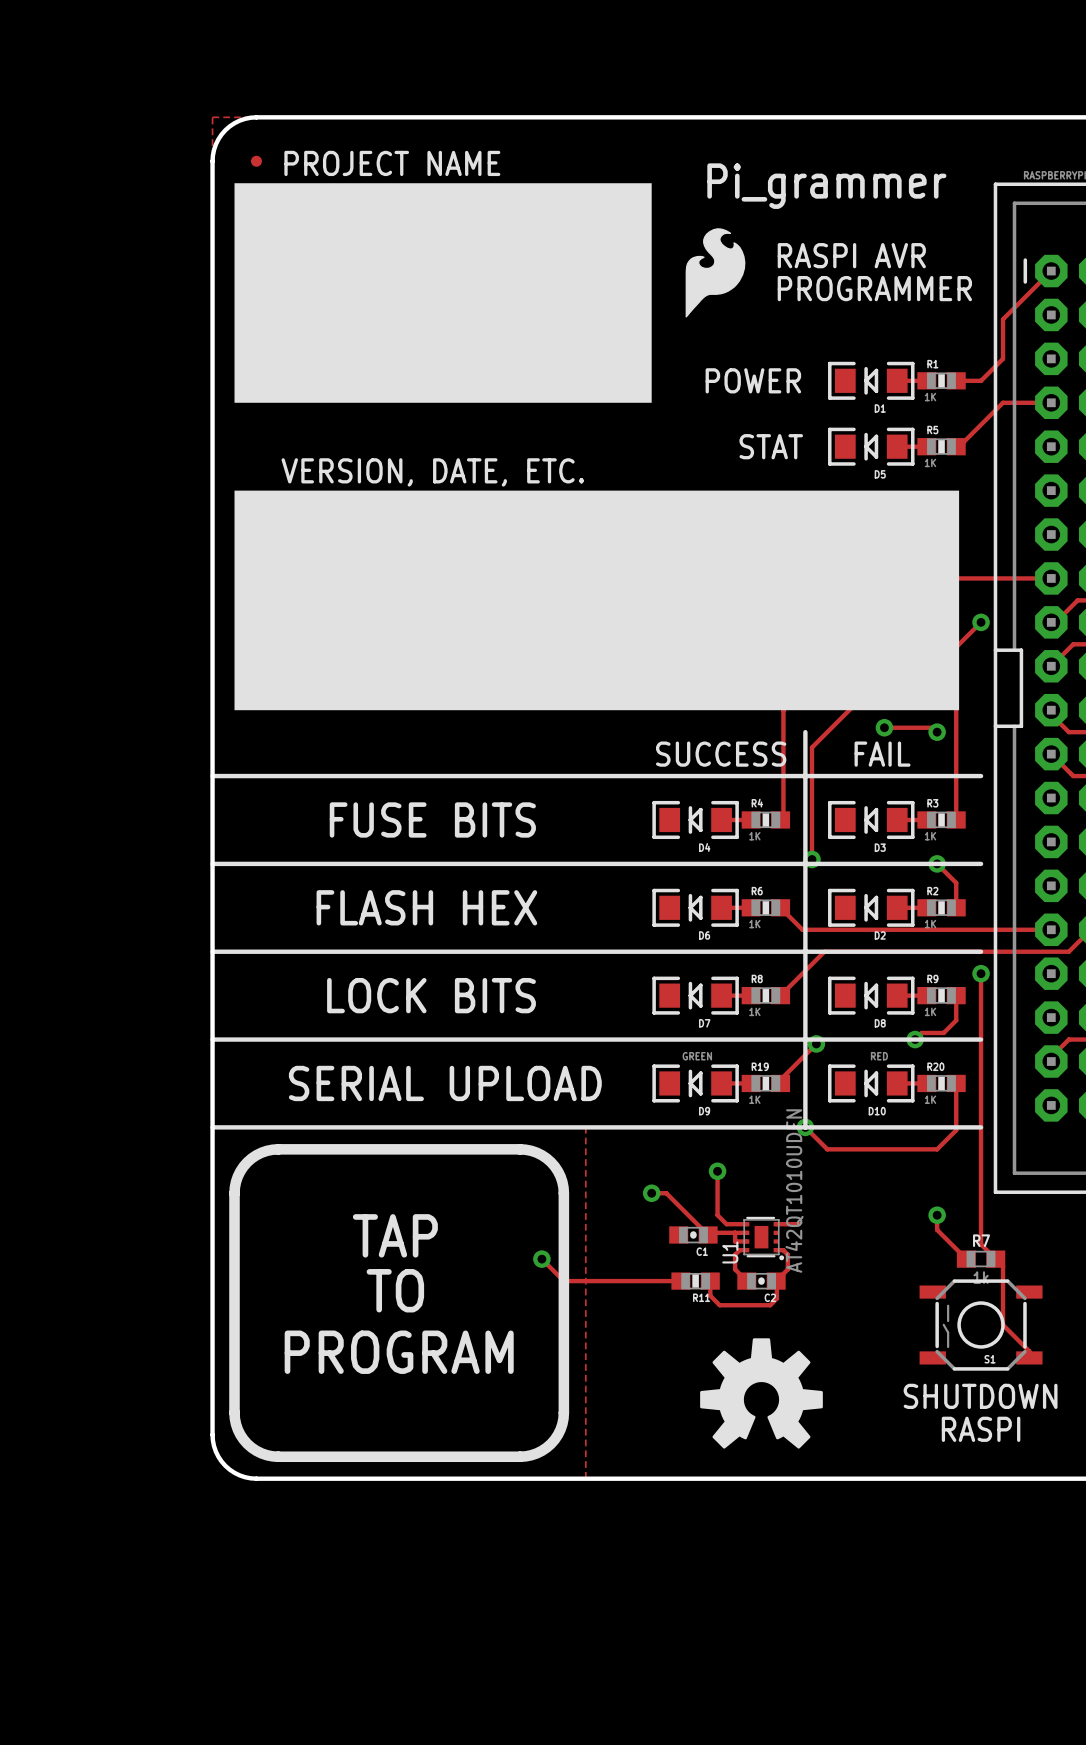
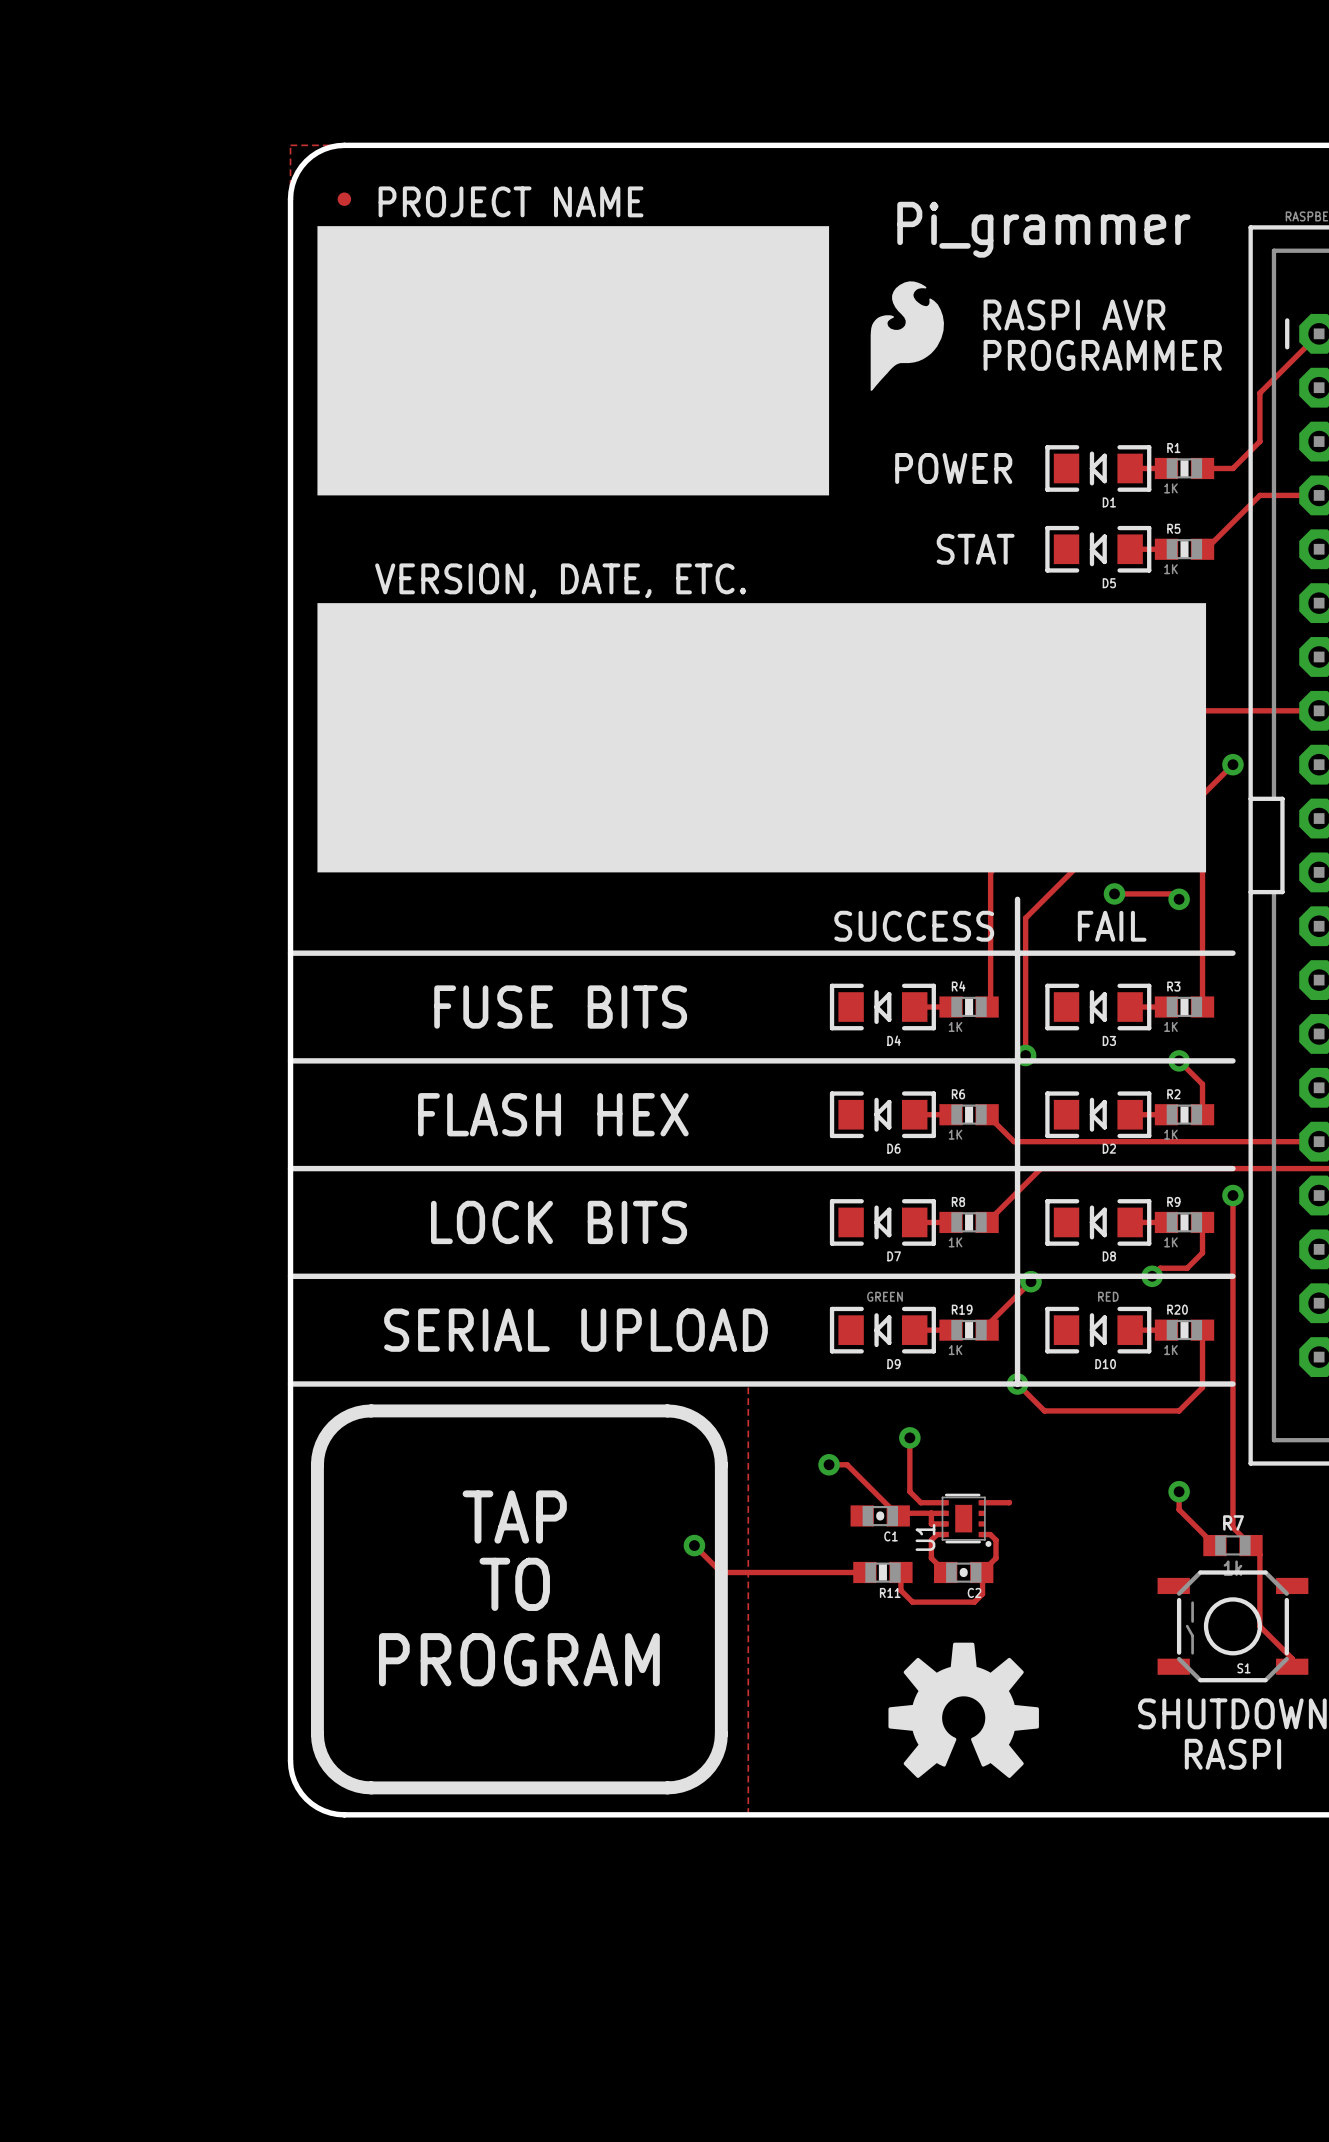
U1 value: AT42QT1010UDFN (794, 1191) -> none

